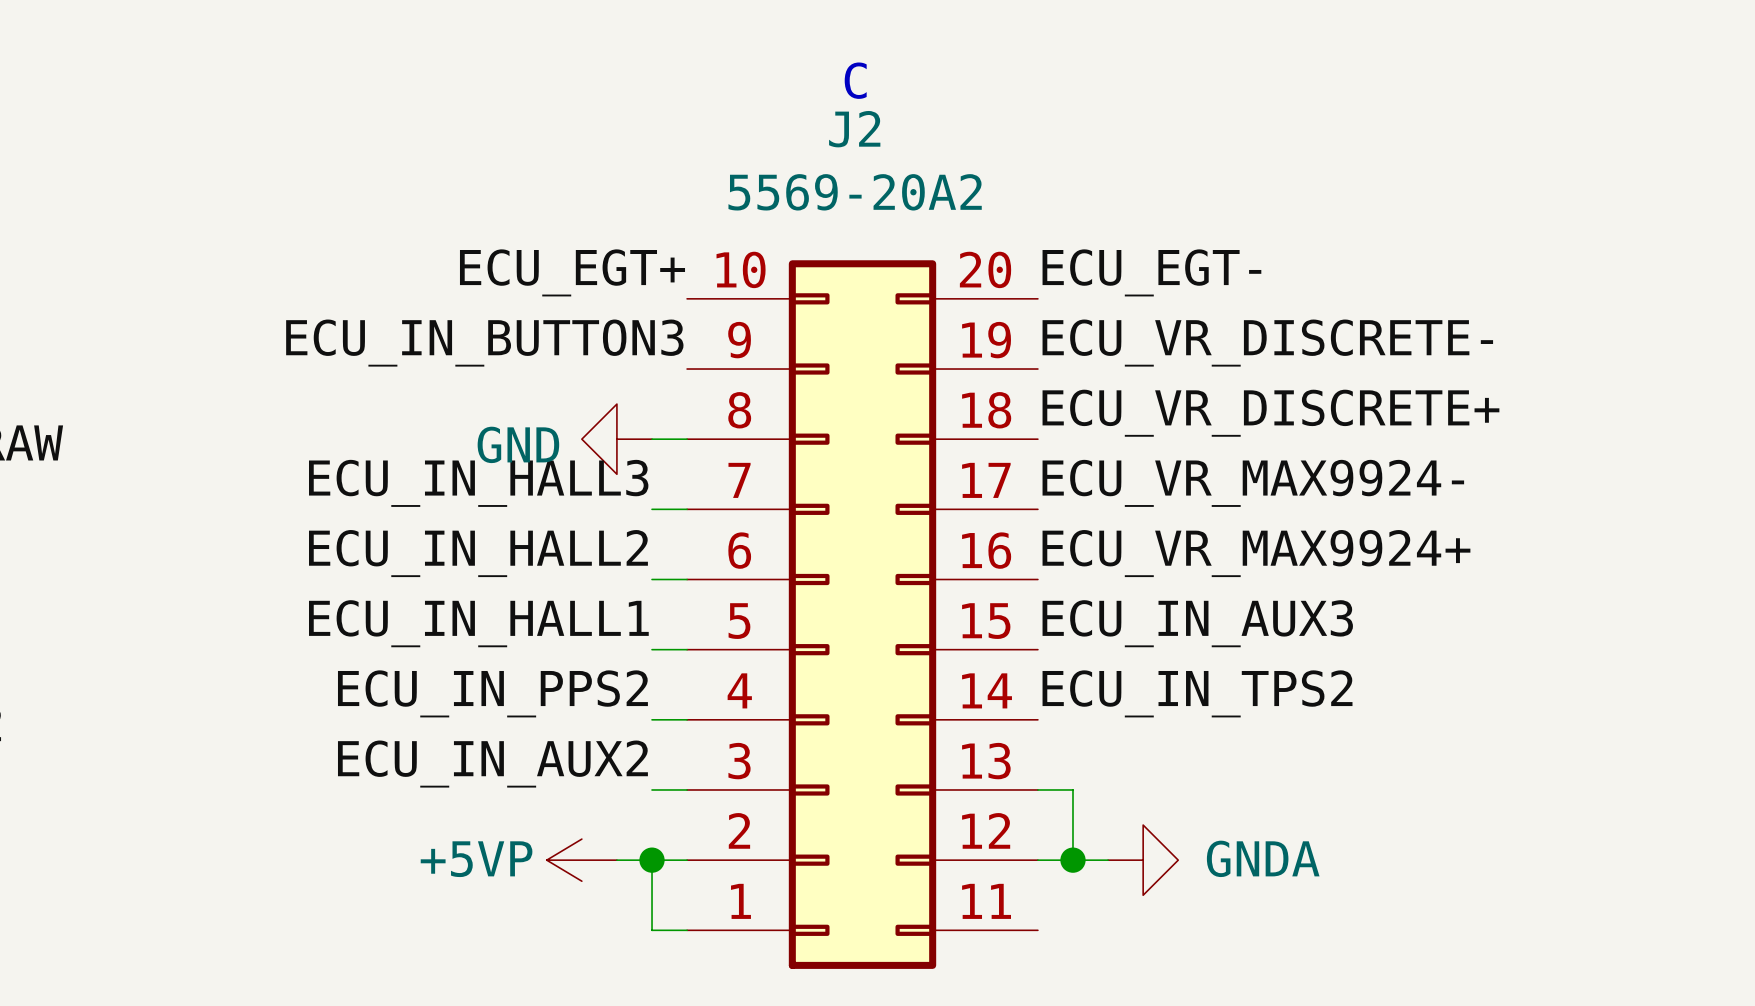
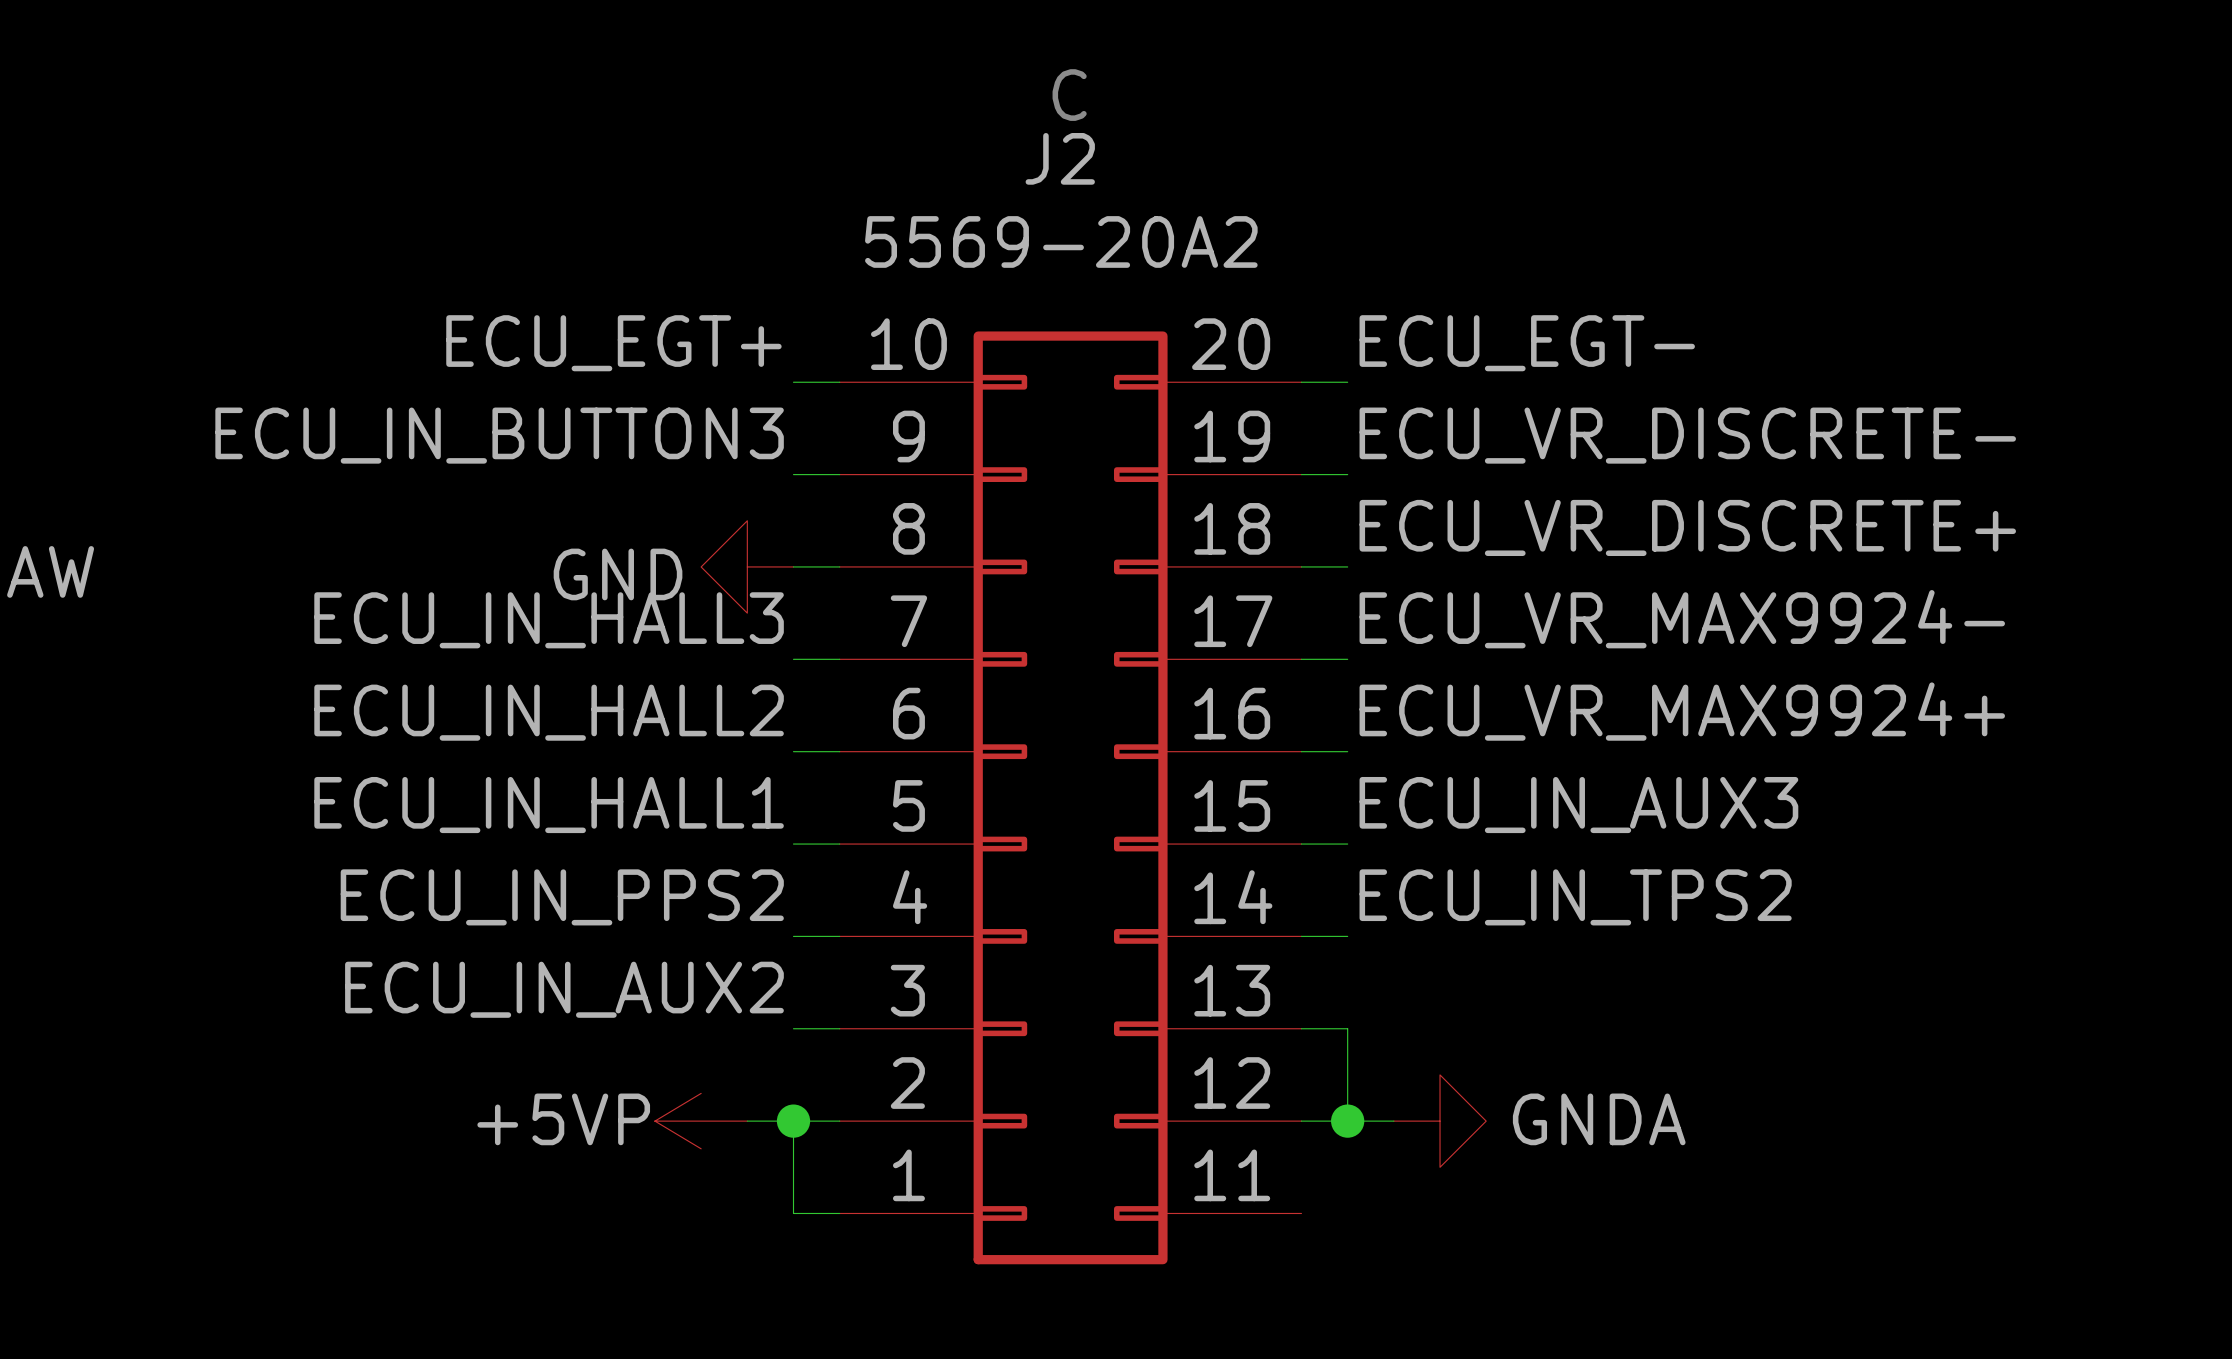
label position: ECU_EGT+ (572, 272) -> ECU_EGT+ (613, 343)
label position: ECU_EGT- (1151, 272) -> ECU_EGT- (1527, 343)
wire: none -> (793, 382) (839, 382)
wire: none -> (1301, 382) (1347, 382)
label position: ECU_IN_BUTTON3 (484, 343) -> ECU_IN_BUTTON3 (499, 435)
label position: ECU_VR_DISCRETE- (1267, 343) -> ECU_VR_DISCRETE- (1687, 435)
wire: none -> (793, 474) (839, 474)
wire: none -> (1301, 474) (1347, 474)
label position: ECU_VR_DISCRETE+ (1270, 413) -> ECU_VR_DISCRETE+ (1687, 527)
wire: none -> (1301, 566) (1347, 566)
label position: ECU_VR_MAX9924- (1253, 483) -> ECU_VR_MAX9924- (1682, 619)
wire: none -> (1301, 659) (1347, 659)
label position: ECU_VR_MAX9924+ (1256, 553) -> ECU_VR_MAX9924+ (1682, 711)
wire: none -> (1301, 751) (1347, 751)
label position: ECU_IN_AUX3 (1197, 623) -> ECU_IN_AUX3 (1578, 805)
wire: none -> (1301, 844) (1347, 844)
label position: ECU_IN_TPS2 (1197, 693) -> ECU_IN_TPS2 (1575, 897)
wire: none -> (1301, 936) (1347, 936)

